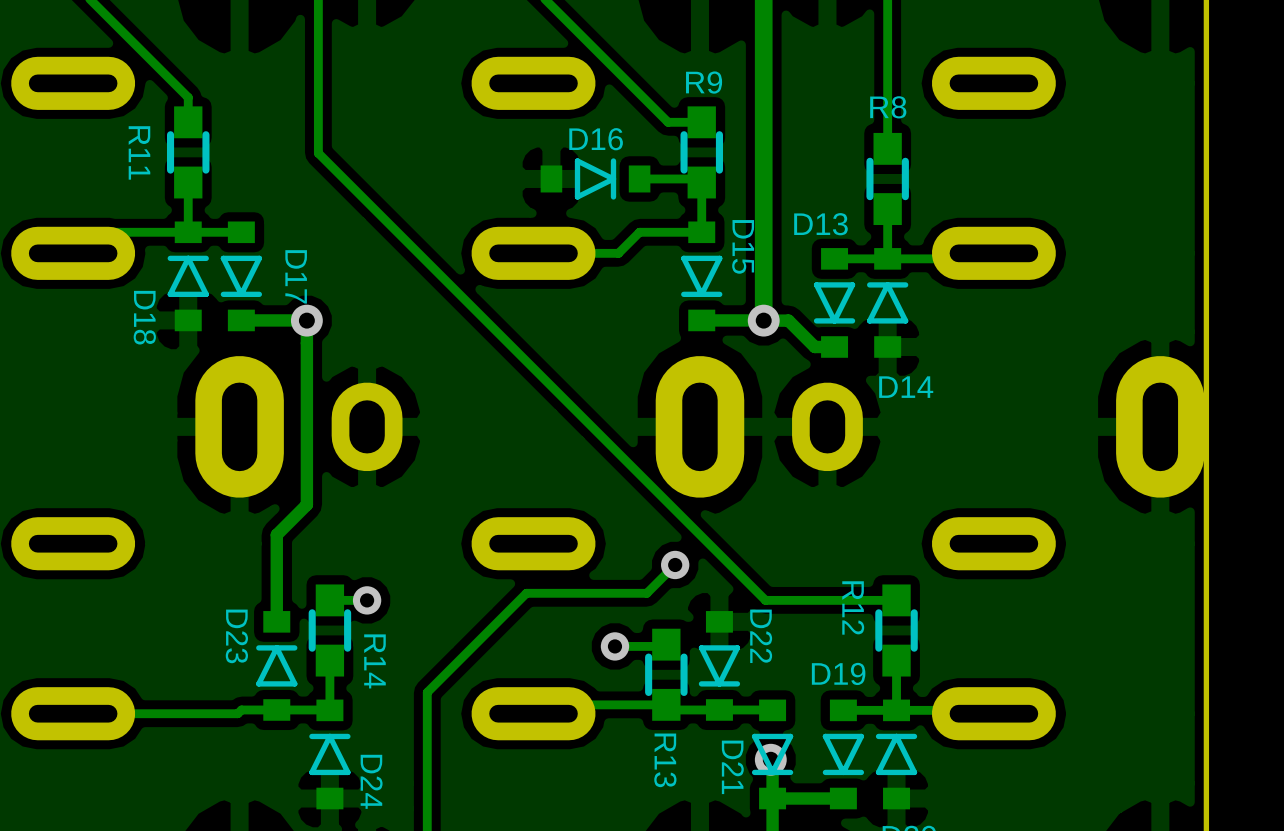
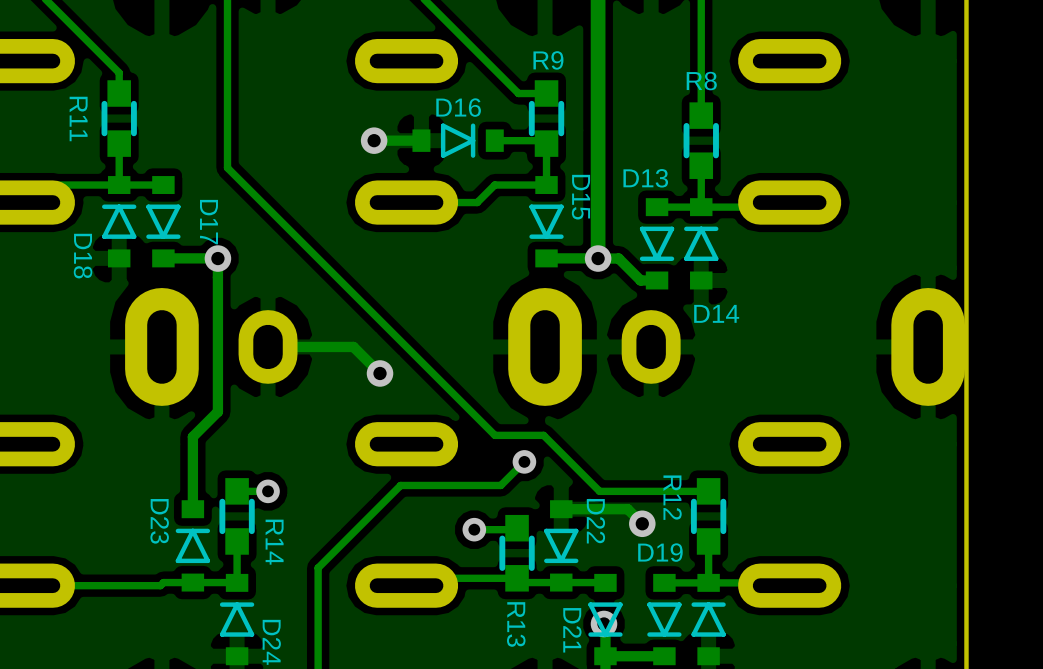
track: (318, 153) (698, 533) -> (227, 119) (227, 167) (494, 435) (543, 435)
via: none -> (374, 140)
track: none -> (421, 140) (374, 140)
track: none -> (268, 346) (353, 346) (380, 373)
via: none -> (380, 373)
track: none -> (561, 509) (627, 509) (642, 523)
via: none -> (642, 523)

